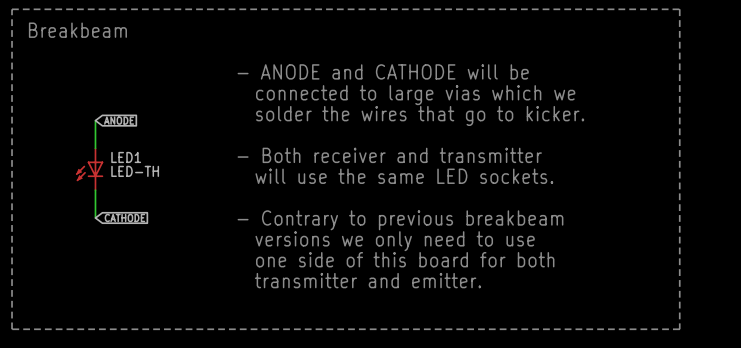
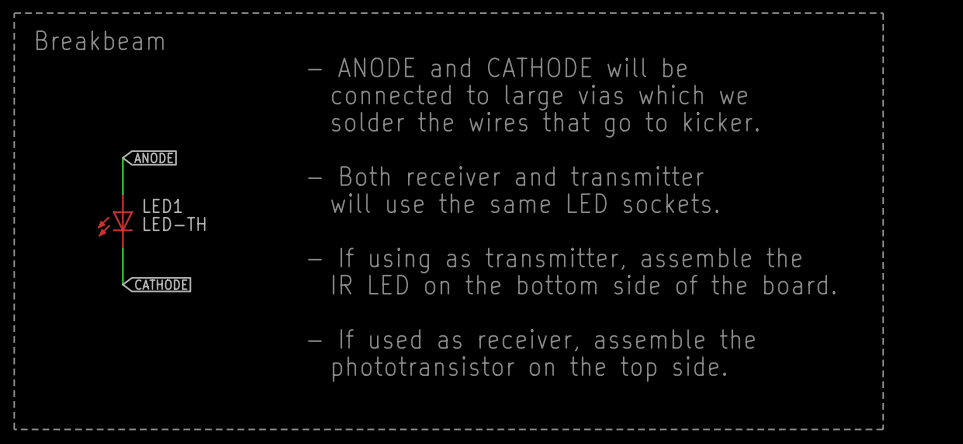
text: none -> - ANODE and CATHODE will be (497, 67)
text: - ANODE and CATHODE will be (383, 71) -> connected to large vias which we (539, 97)
text: connected to large vias which we (415, 95) -> solder the wires that go to kicker. (545, 124)
text: solder the wires that go to kicker. (420, 115) -> none
text: none -> - Both receiver and transmitter (505, 176)
text: - Both receiver and transmitter (389, 155) -> will use the same LED sockets. (524, 203)
text: will use the same LED sockets. (404, 176) -> none
text: none -> - If using as transmitter, assemble the (554, 260)
text: - Contrary to previous breakbeam (400, 220) -> IR LED on the bottom side of the board. (584, 284)
text: versions we only need to use (395, 241) -> none
text: one side of this board for both (405, 259) -> - If used as receiver, assemble the (531, 340)
text: transmitter and emitter. (367, 280) -> phototransistor on the top side. (529, 369)

